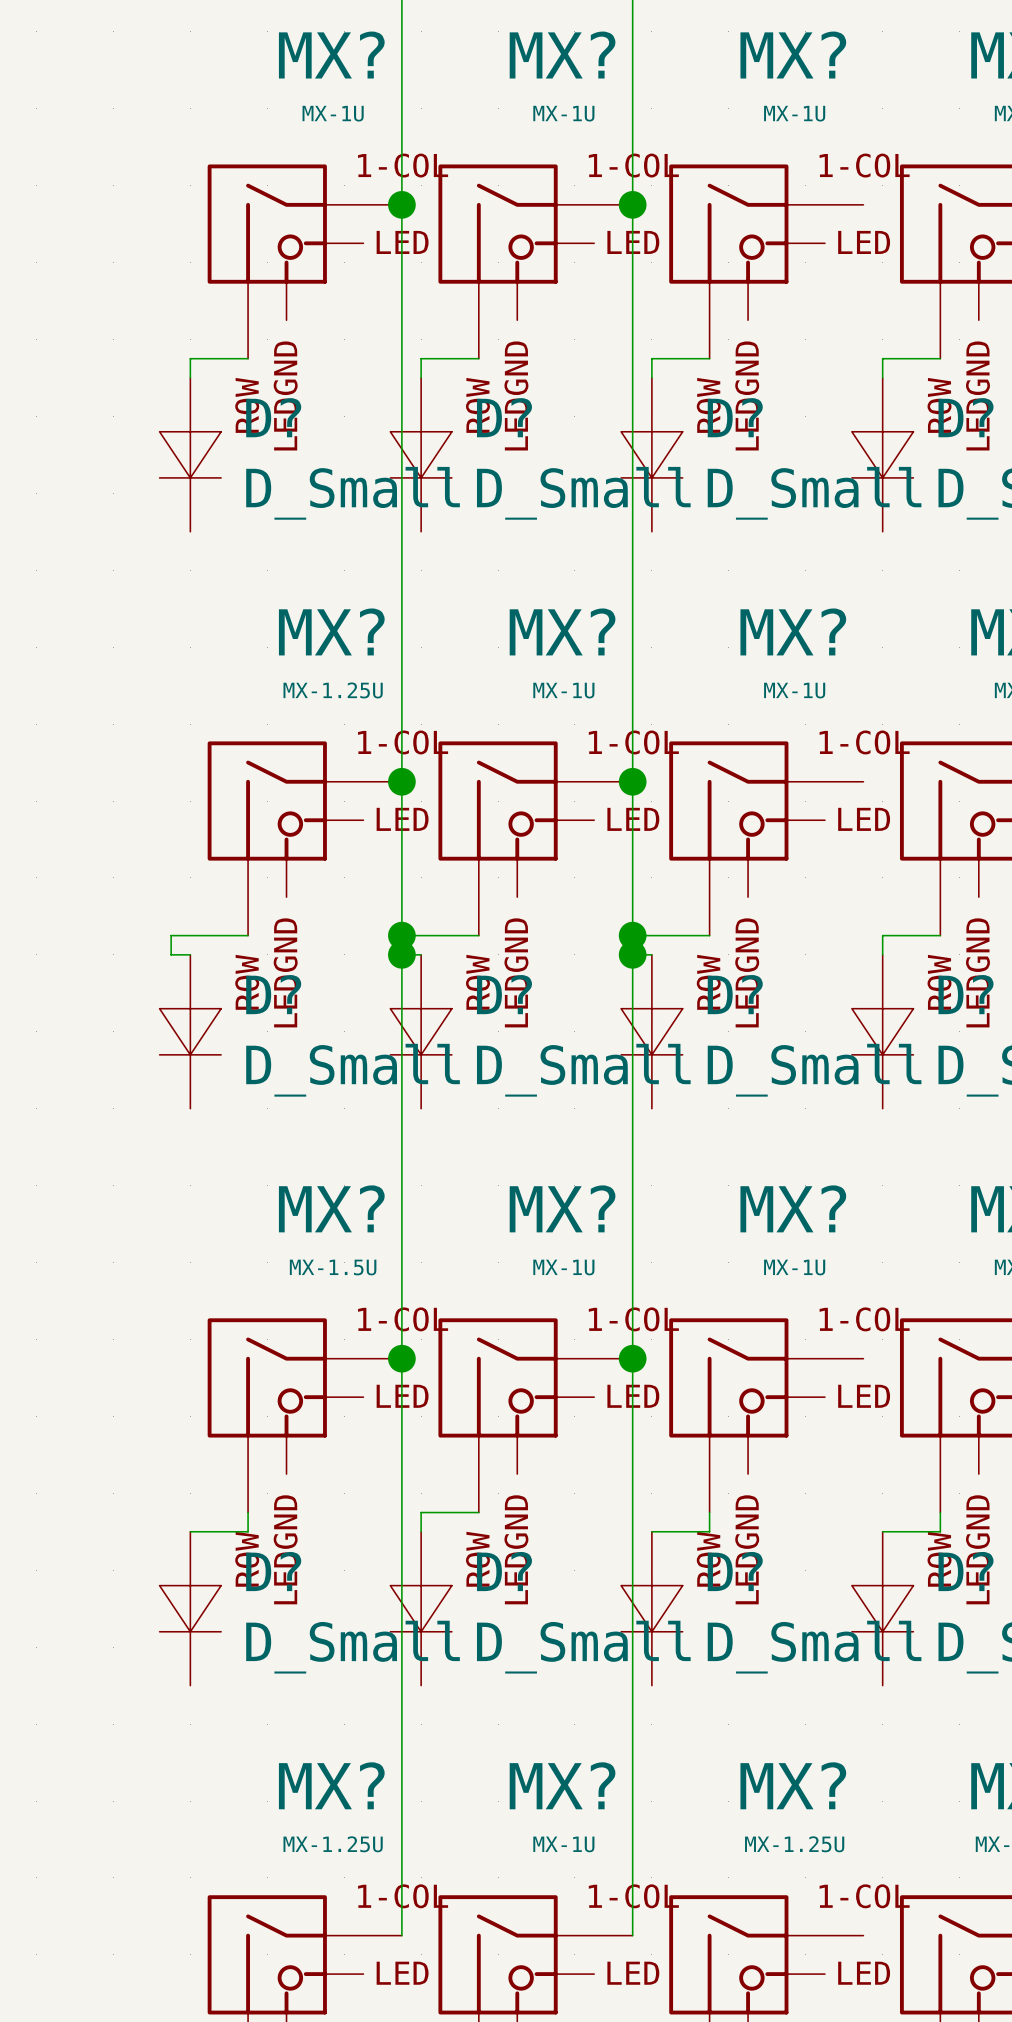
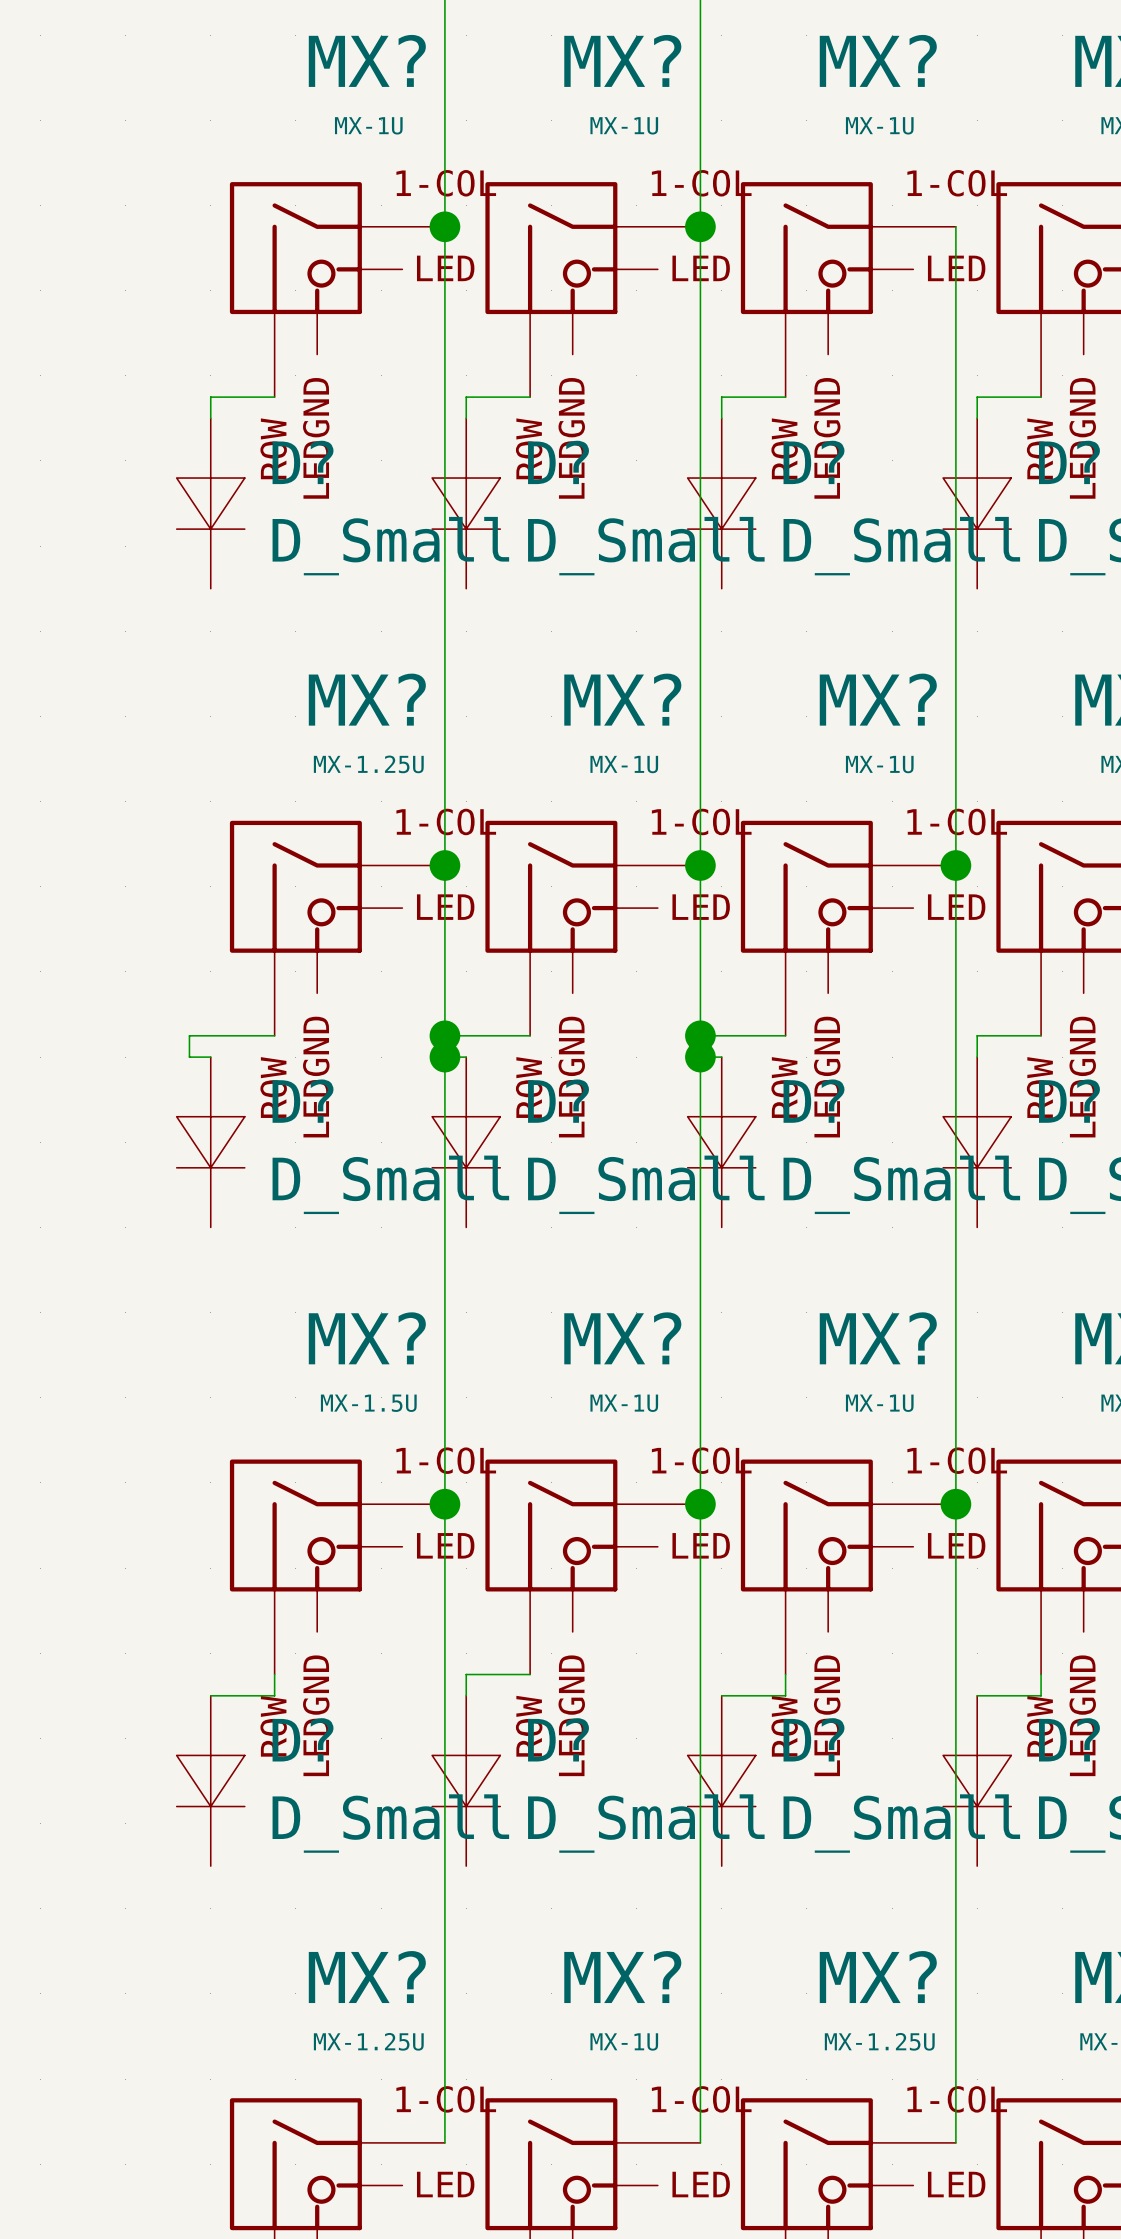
wire: none -> (955, 226) (955, 2142)
junction: none -> (955, 865)
junction: none -> (955, 1504)

